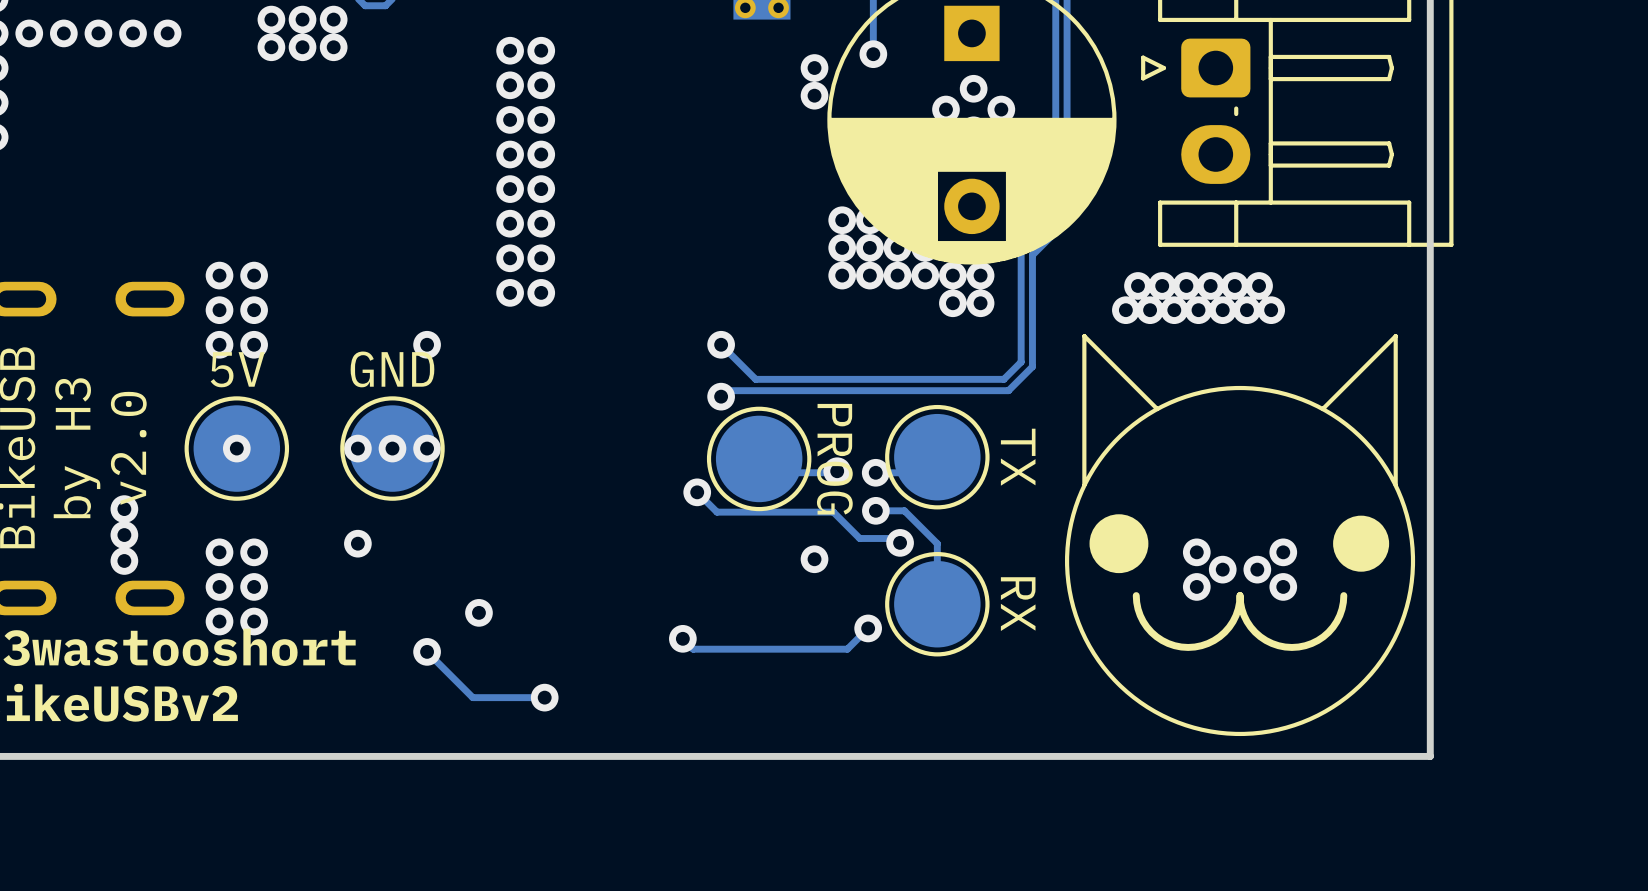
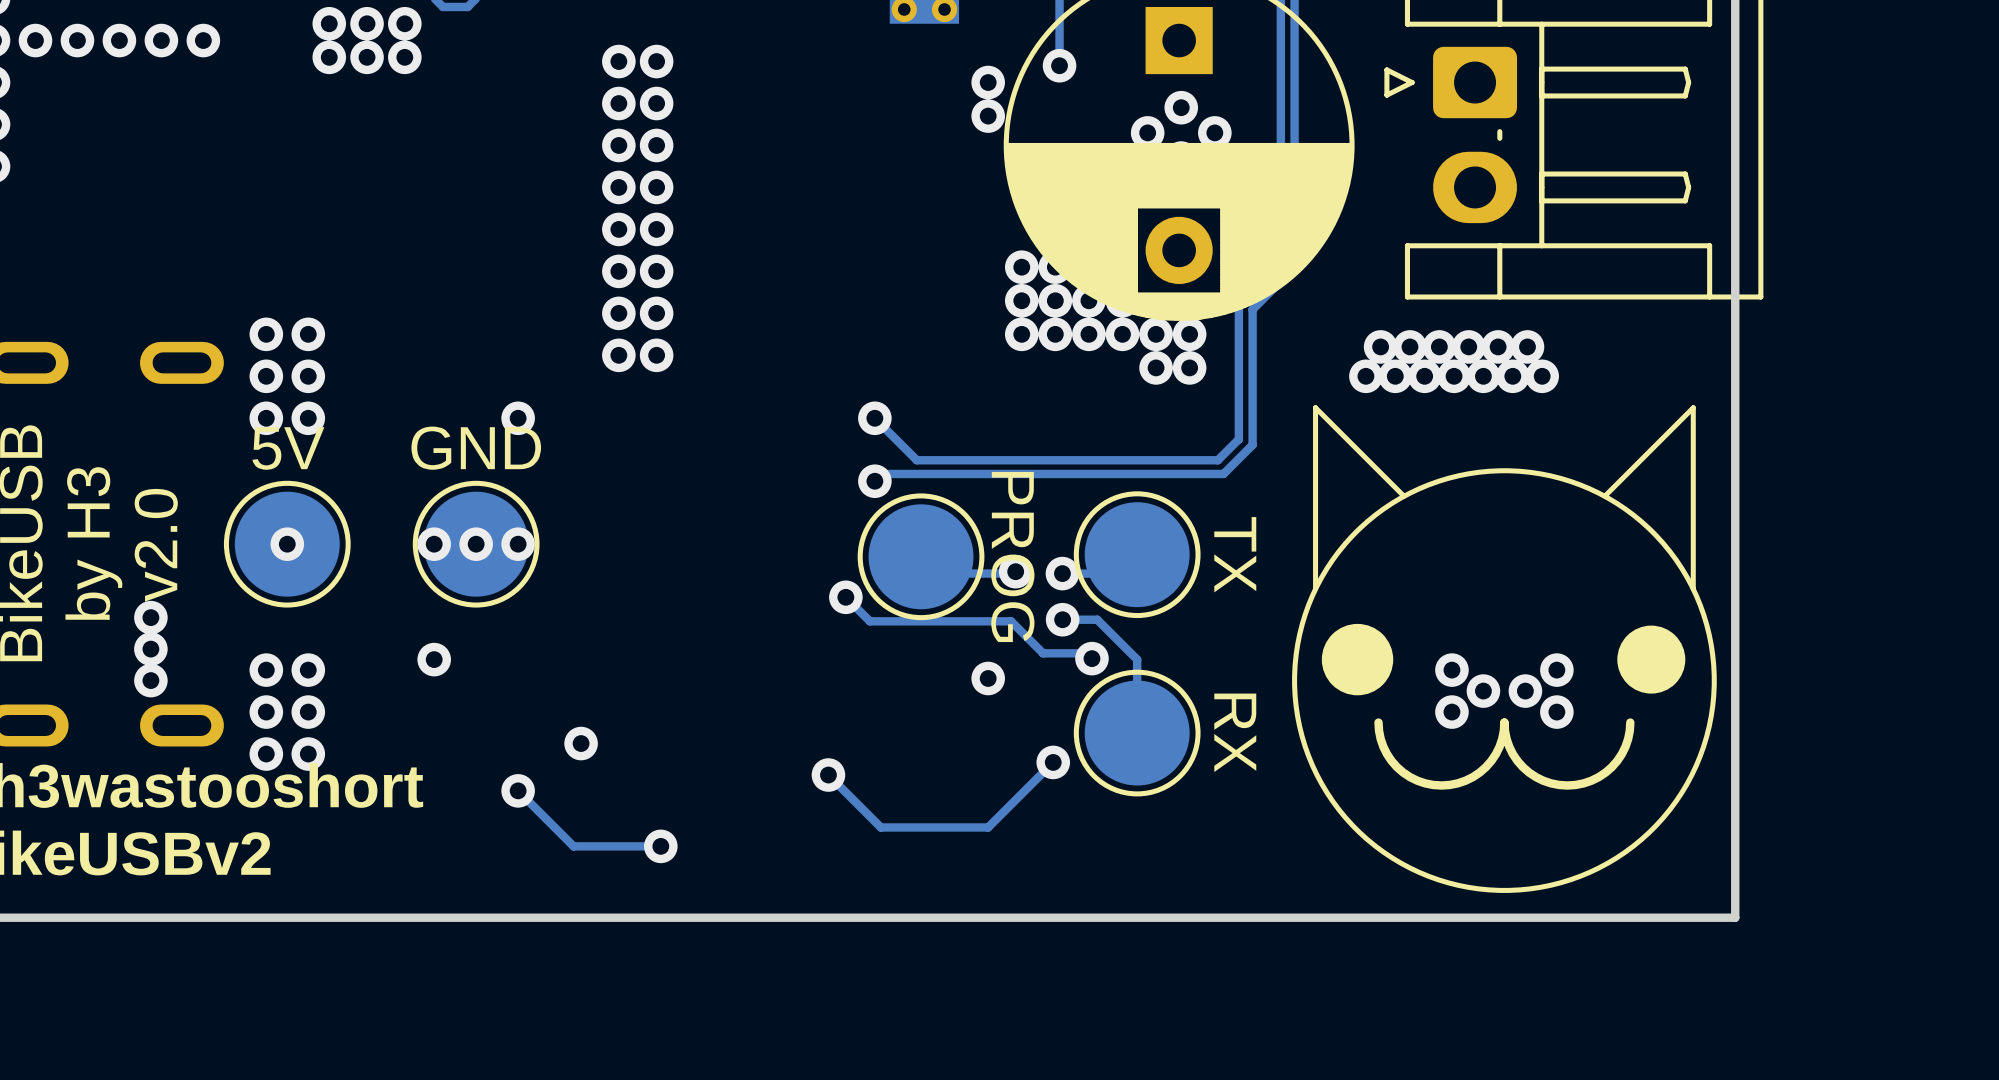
track: (847, 649) (693, 649) -> (1028, 787) (988, 827) (880, 827) (841, 787)

